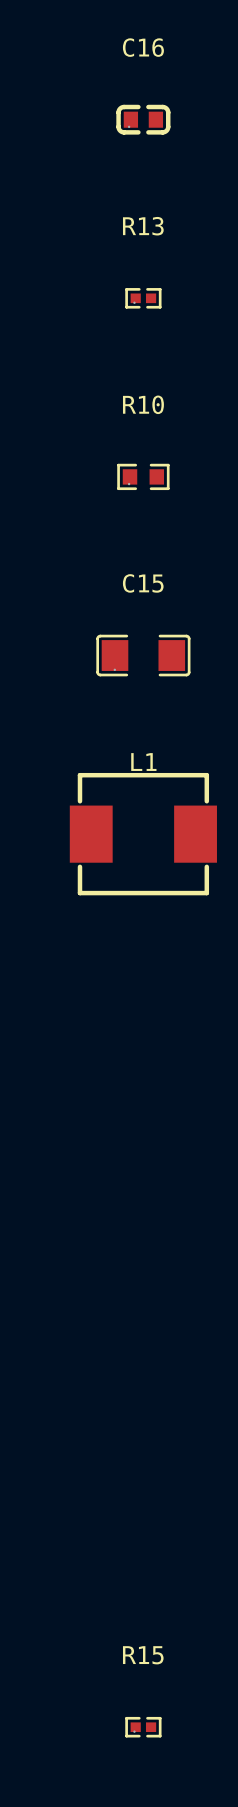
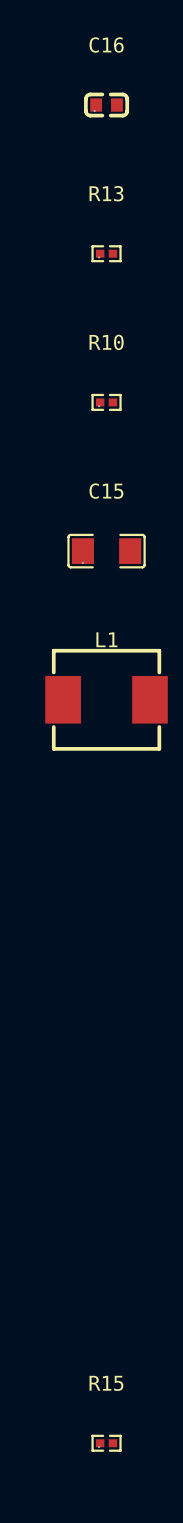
R10 footprint: [117, 463, 170, 491] -> [91, 393, 122, 411]

